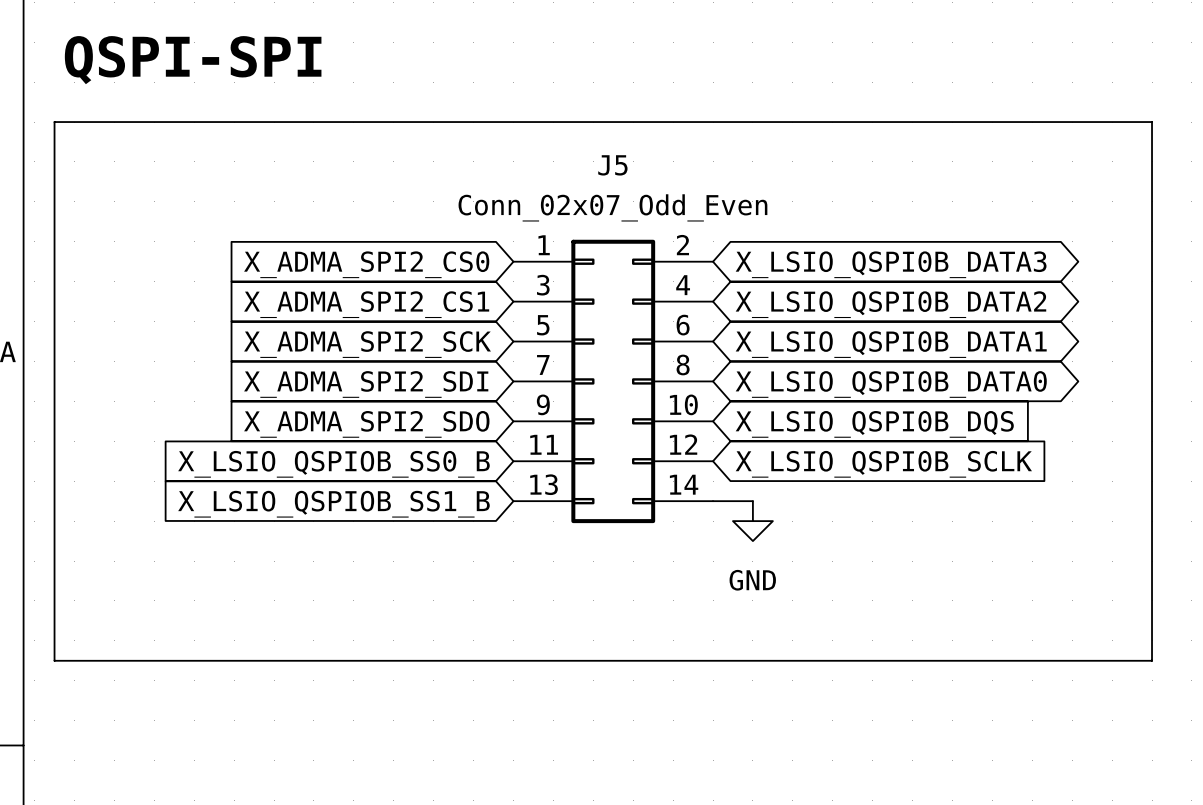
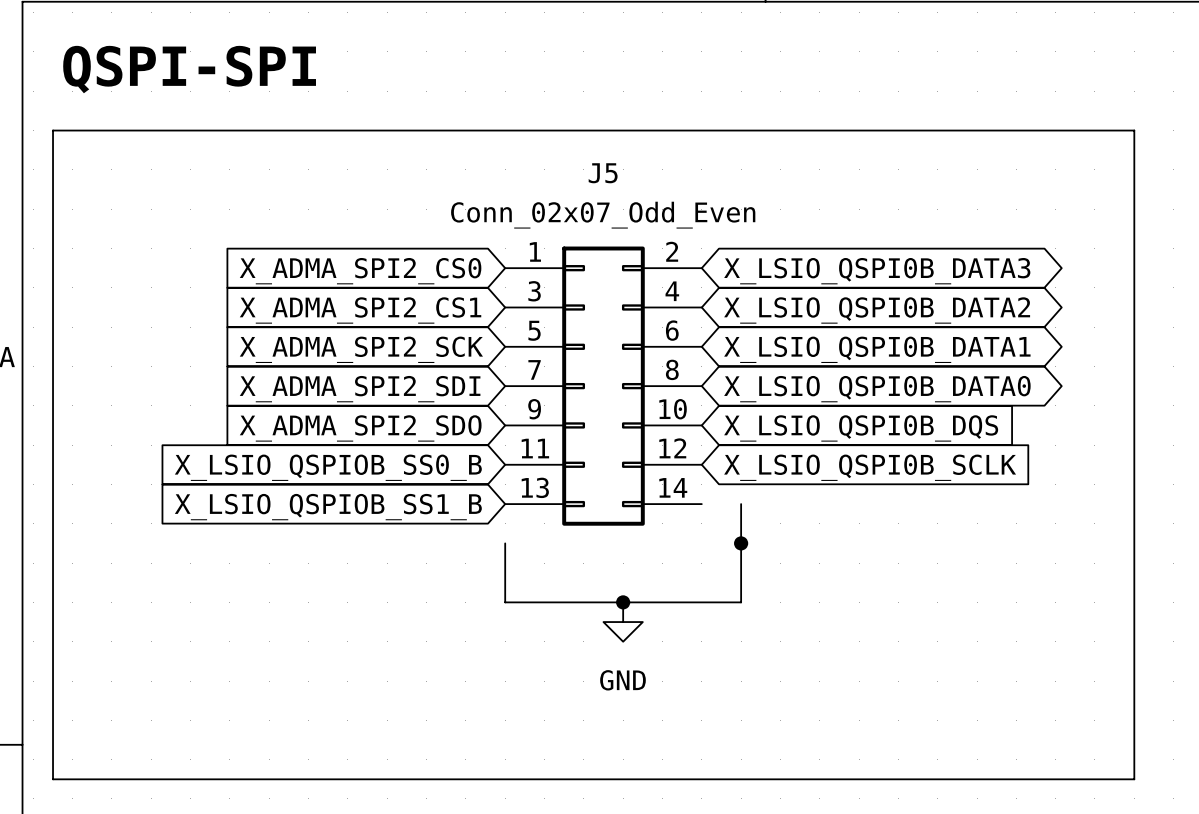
wire: (713, 501) (752, 501) -> (505, 543) (505, 602) (741, 602) (741, 504)
power symbol position: GND (752, 521) -> GND (623, 622)
junction: none -> (741, 543)
junction: none -> (623, 602)
line: (54, 660) (1152, 660) -> (53, 661) (53, 779) (1134, 779) (1134, 661)

